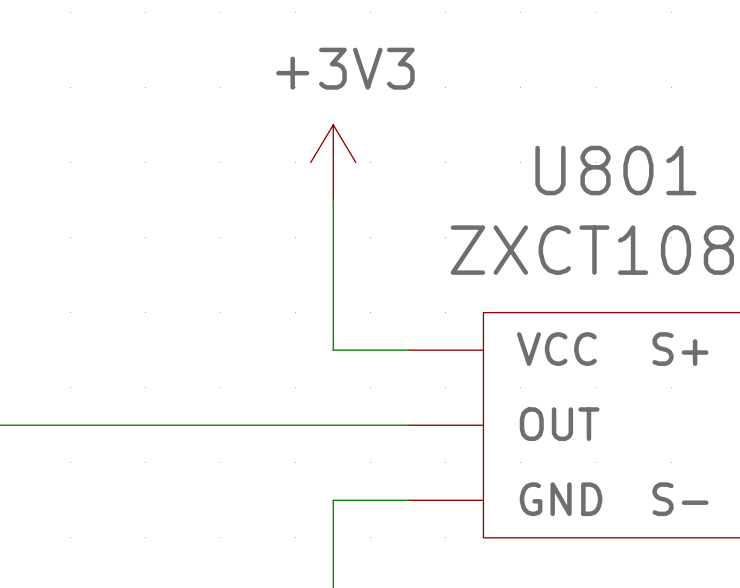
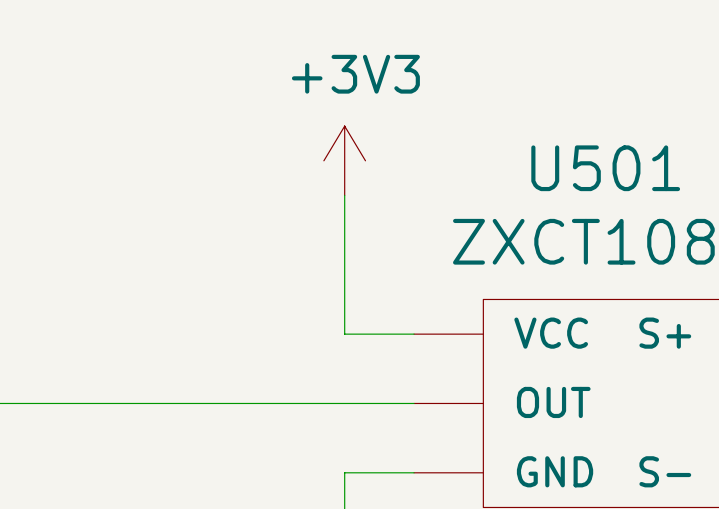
U801 name: U801 (615, 170) -> U501 (605, 168)

